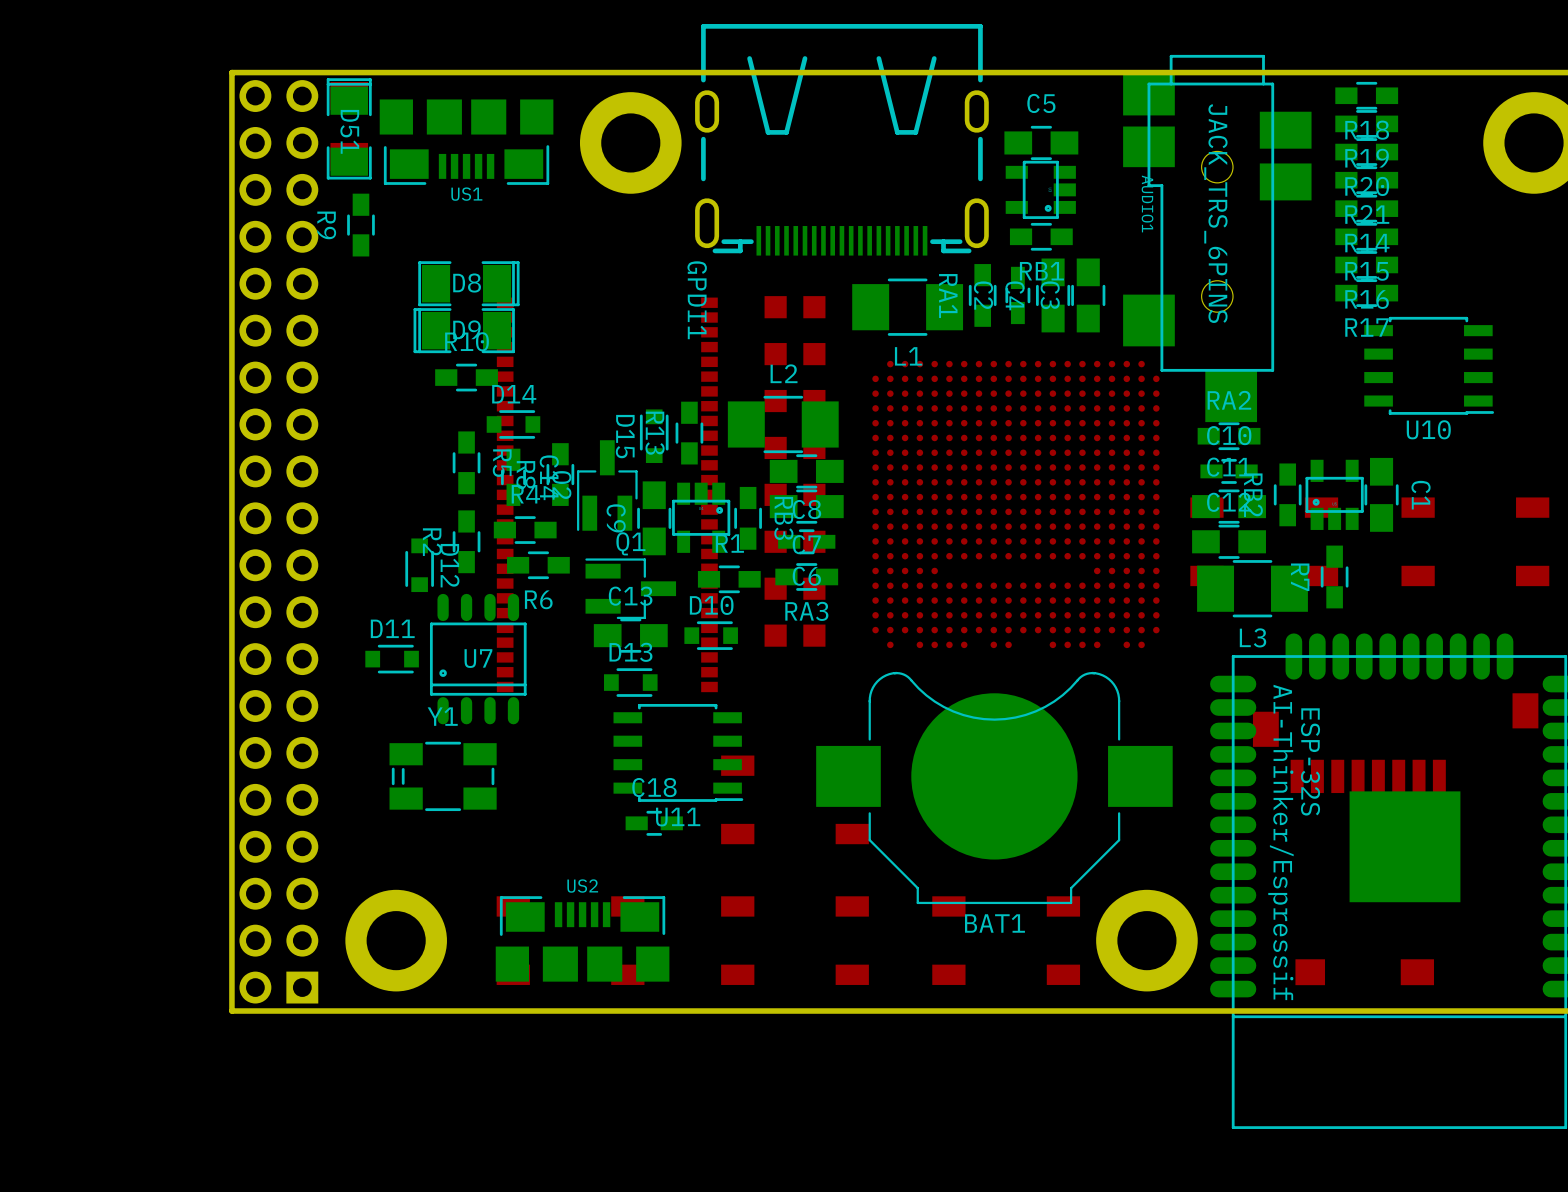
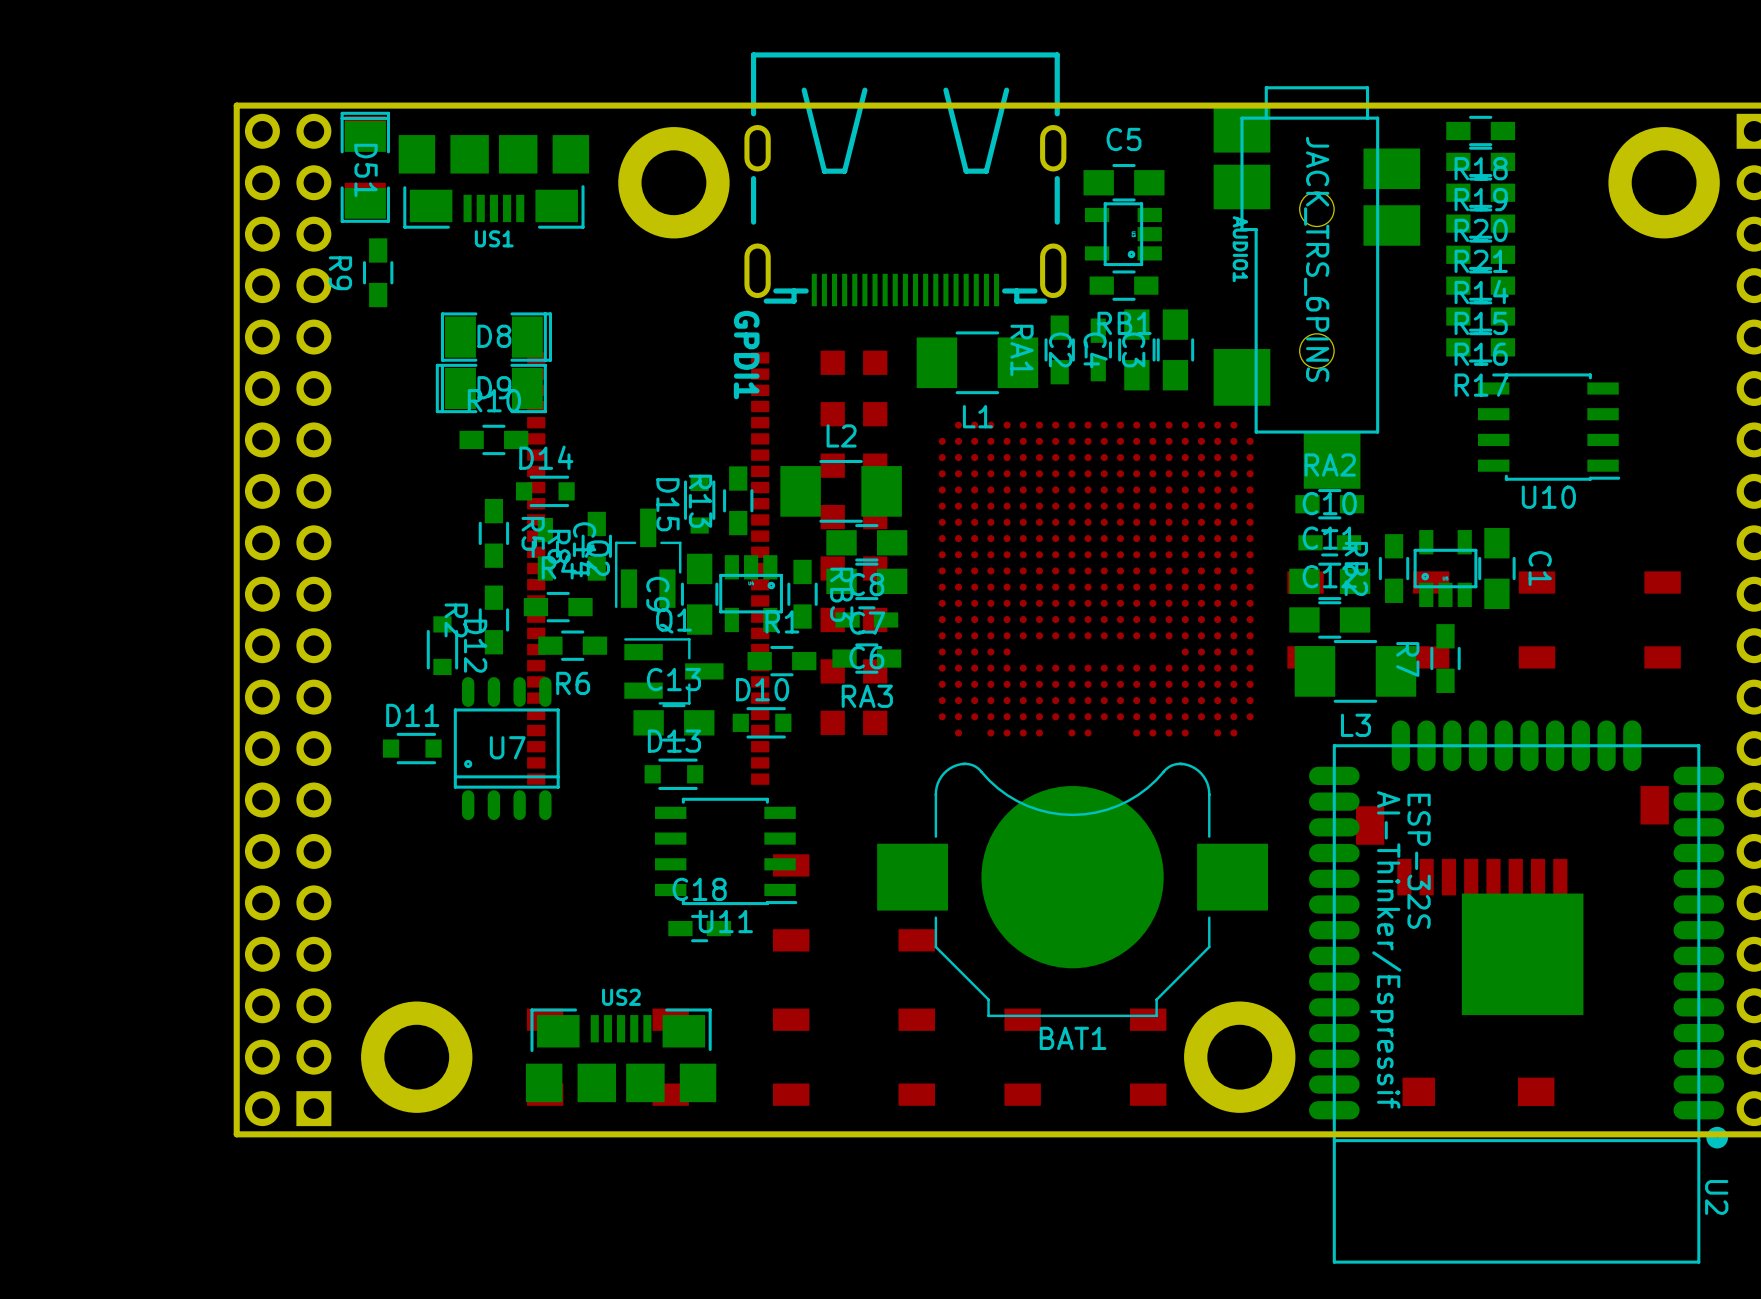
Y1: (443, 776) -> none

